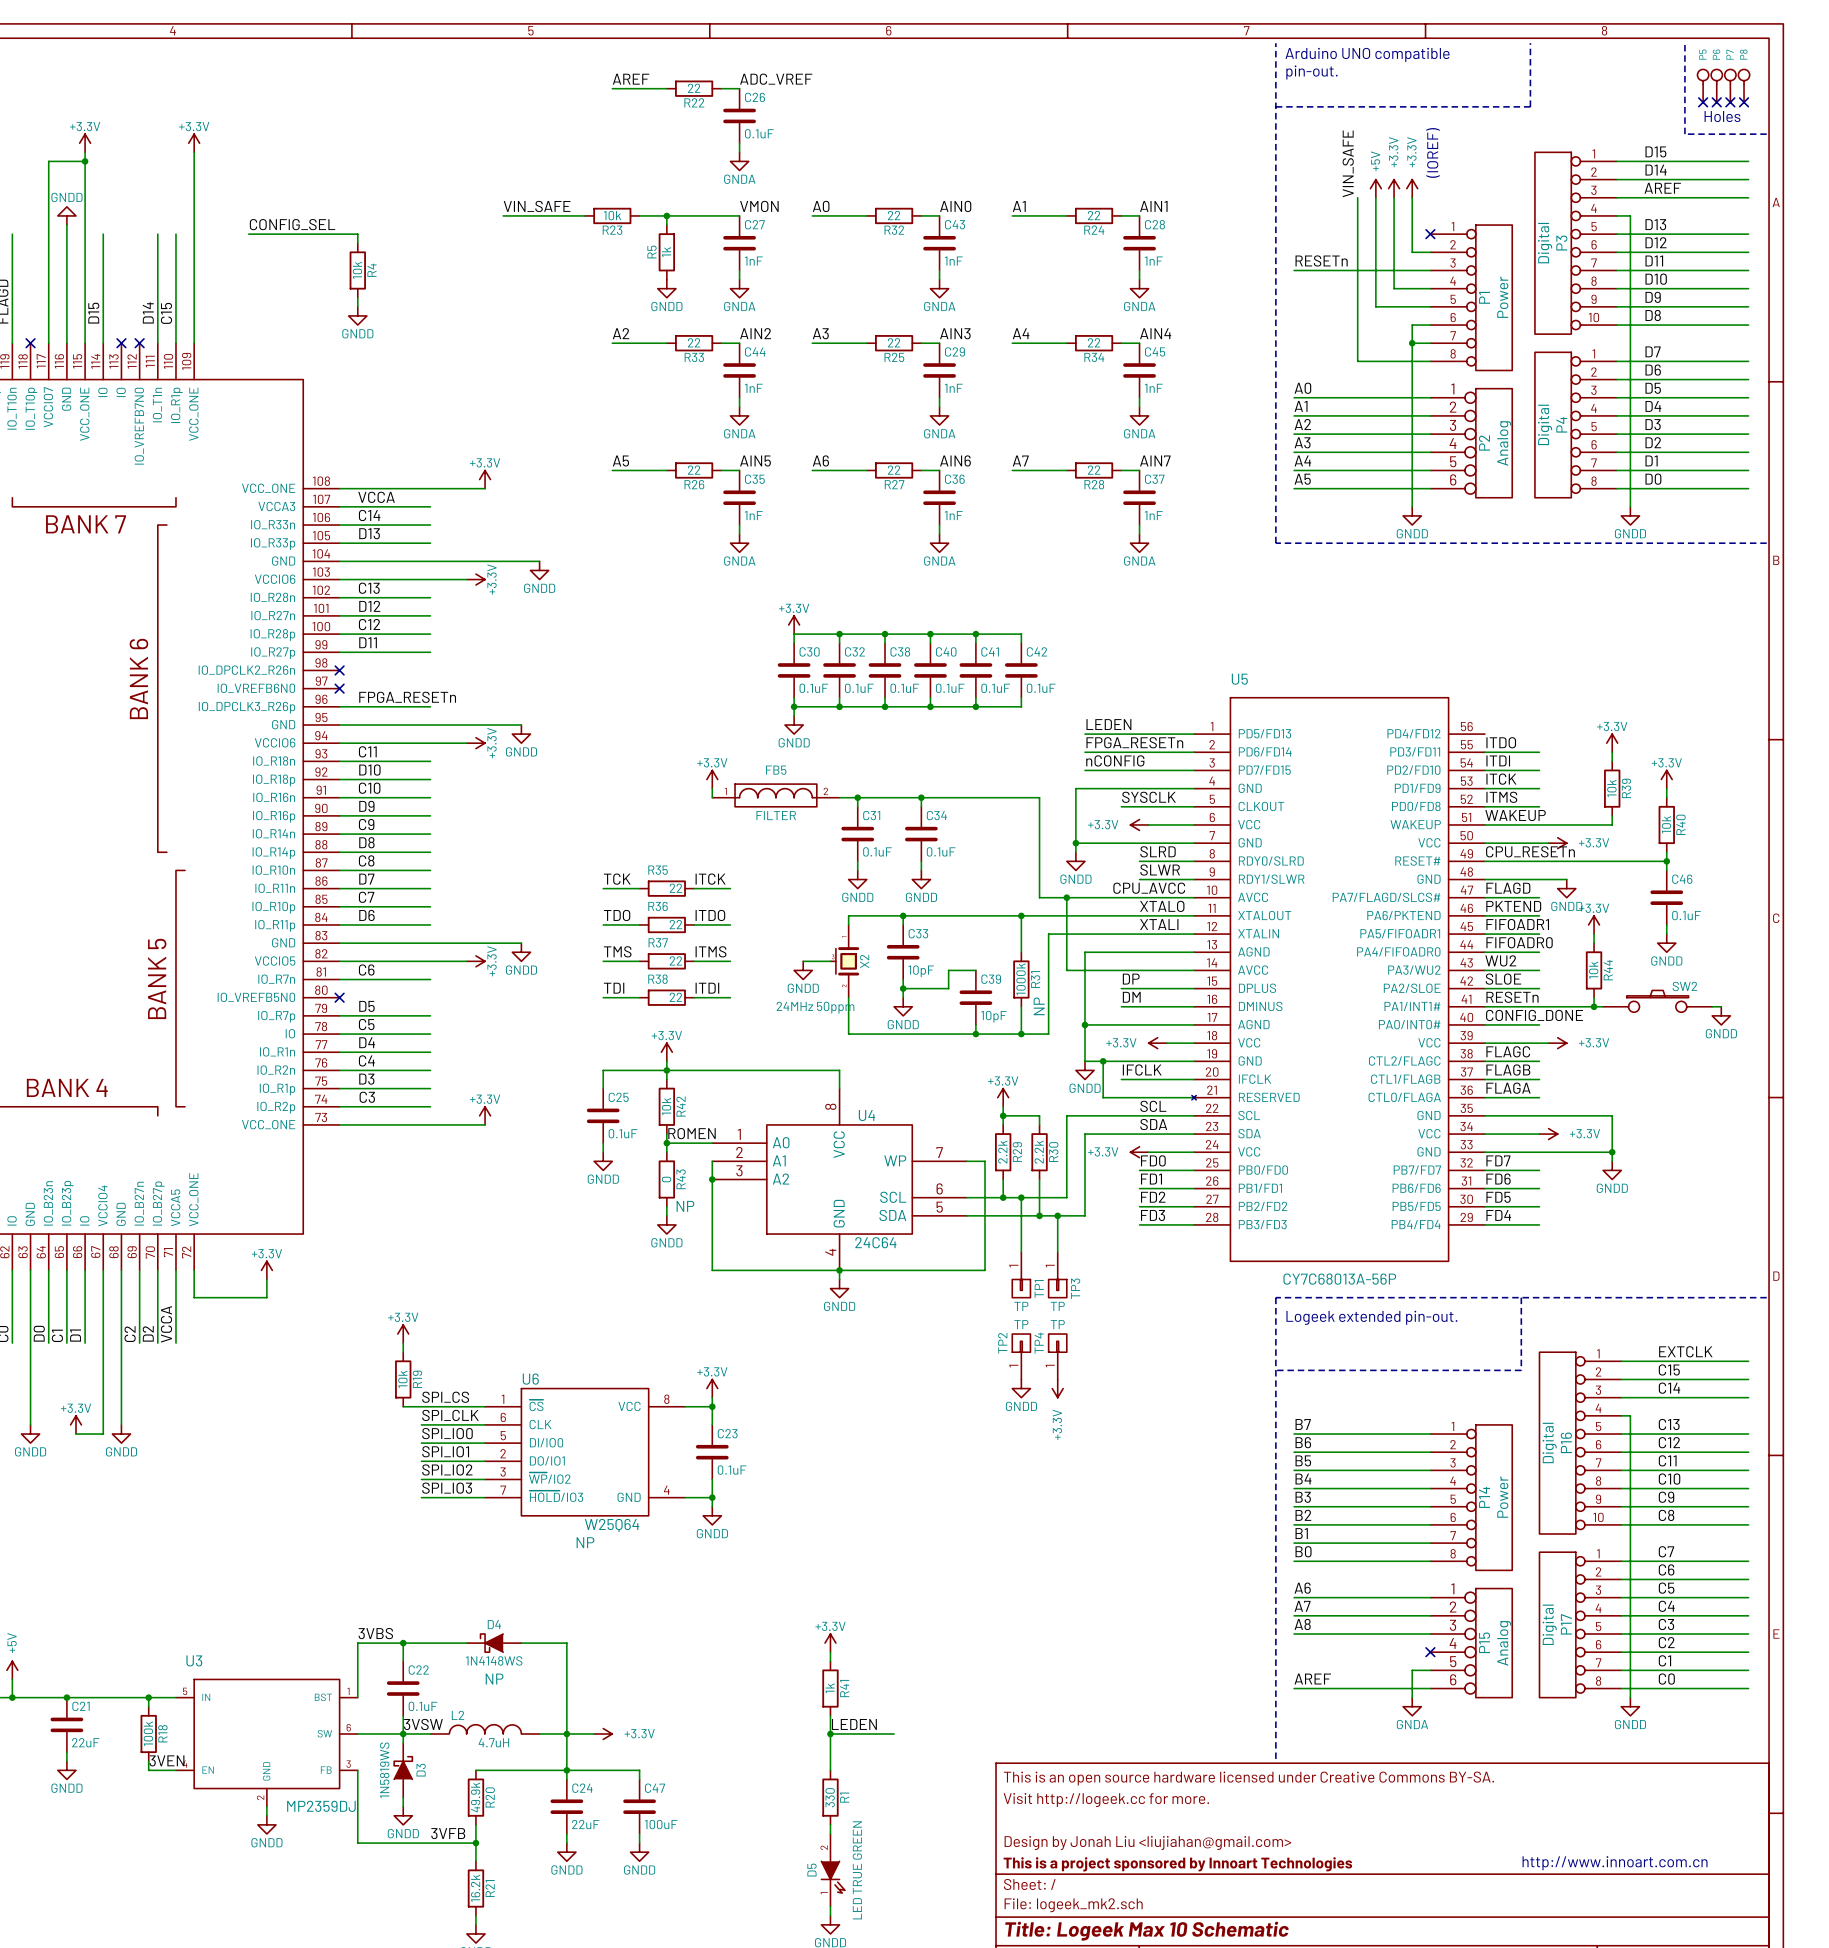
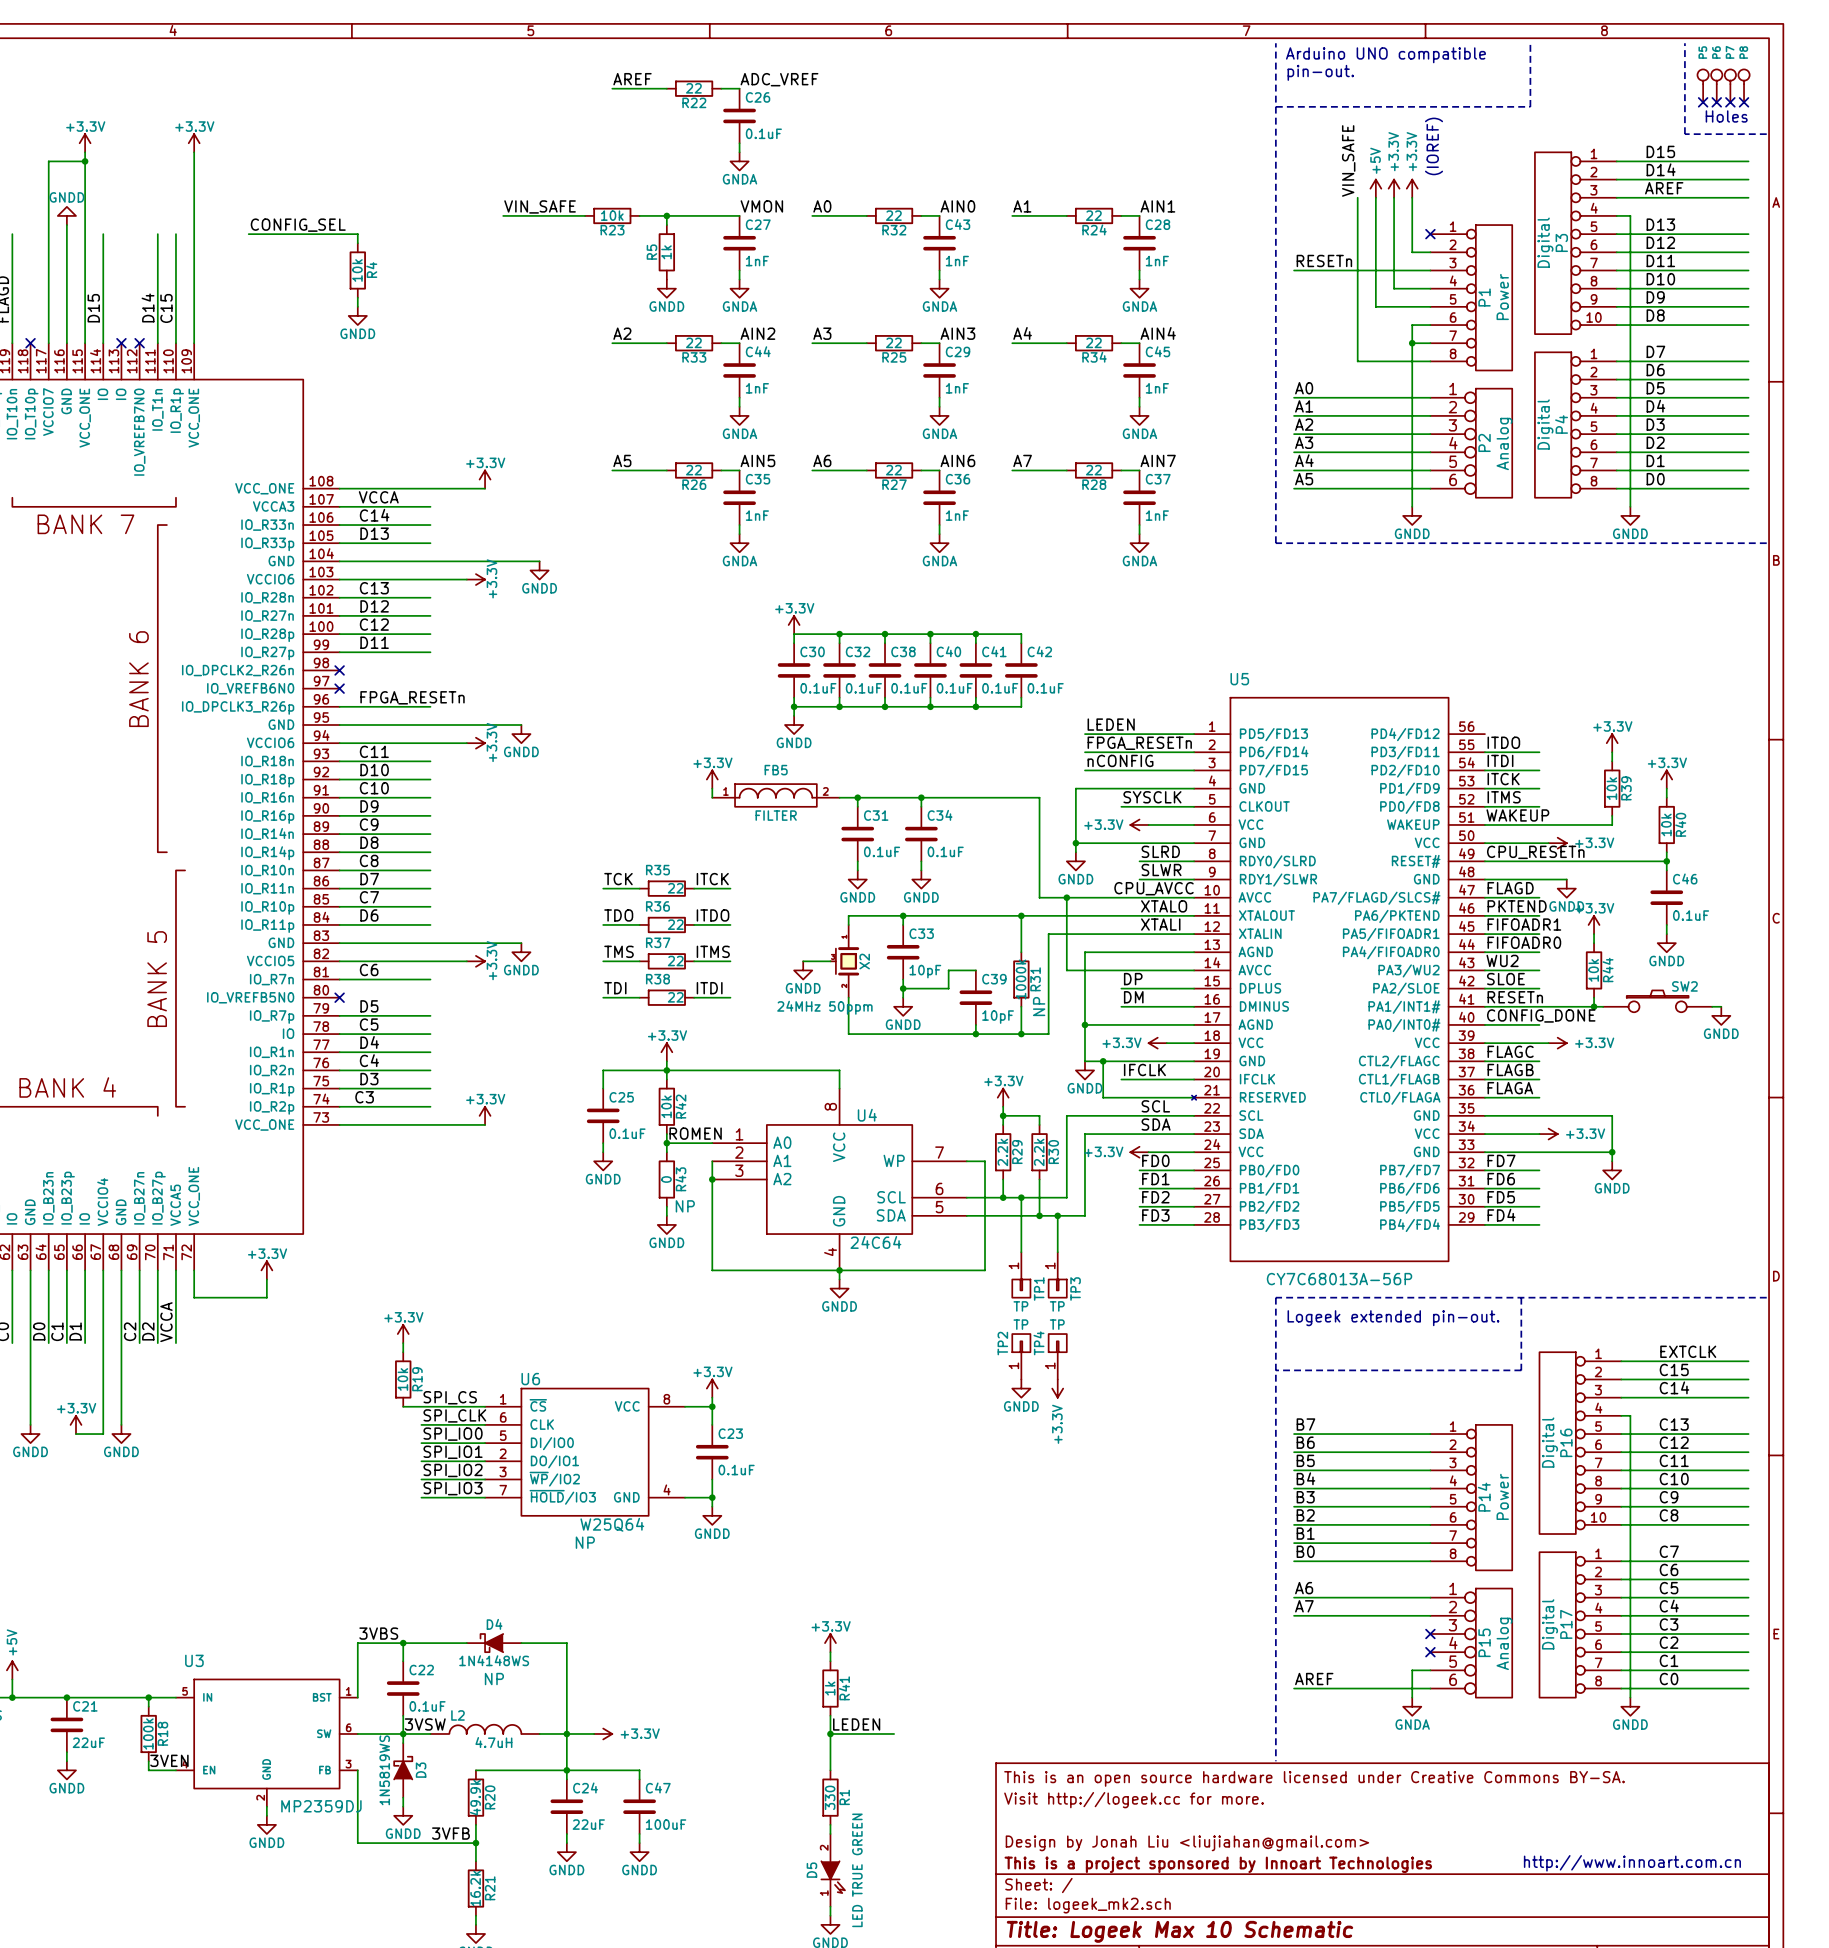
label: A8 (1302, 1624) -> none
wire: (1294, 1634) (1430, 1634) -> none
no-connect mark: none -> (1430, 1634)

